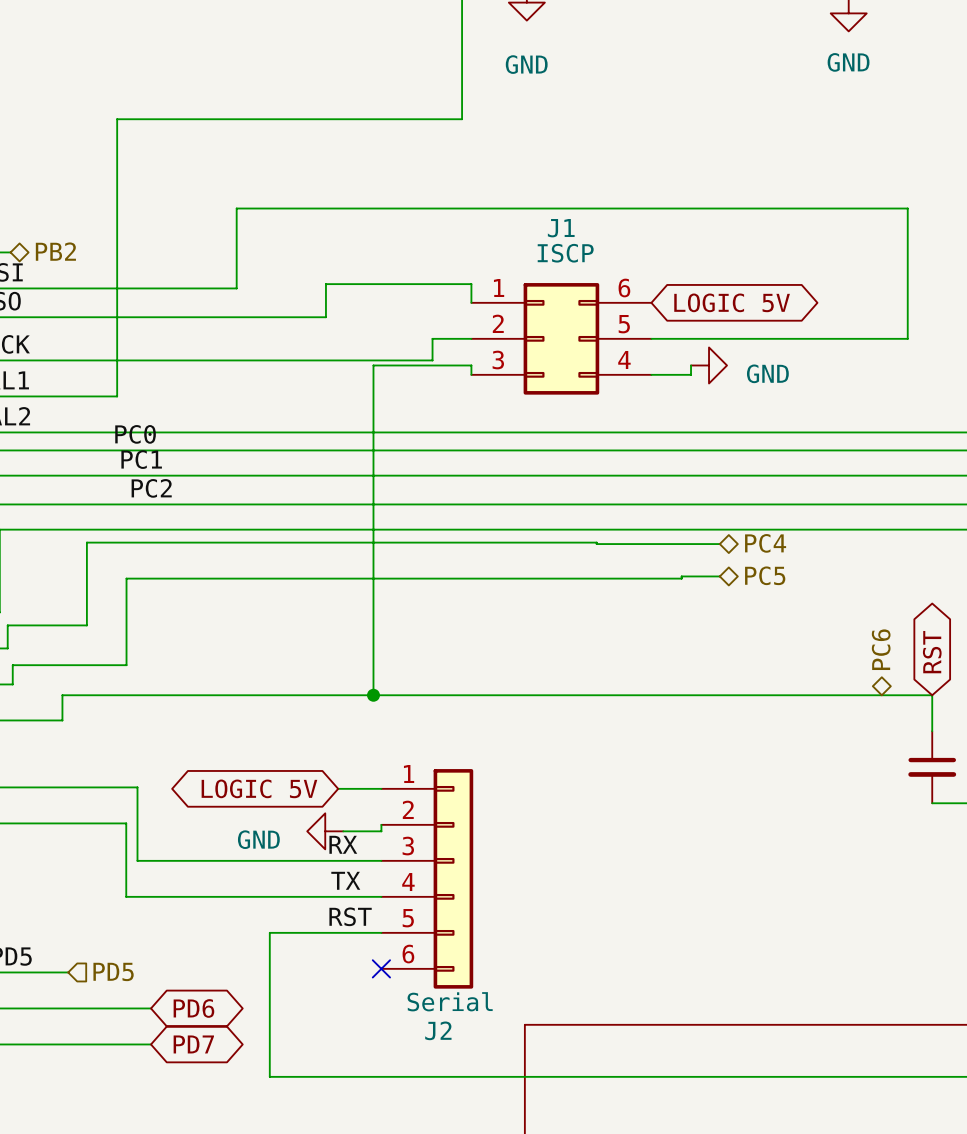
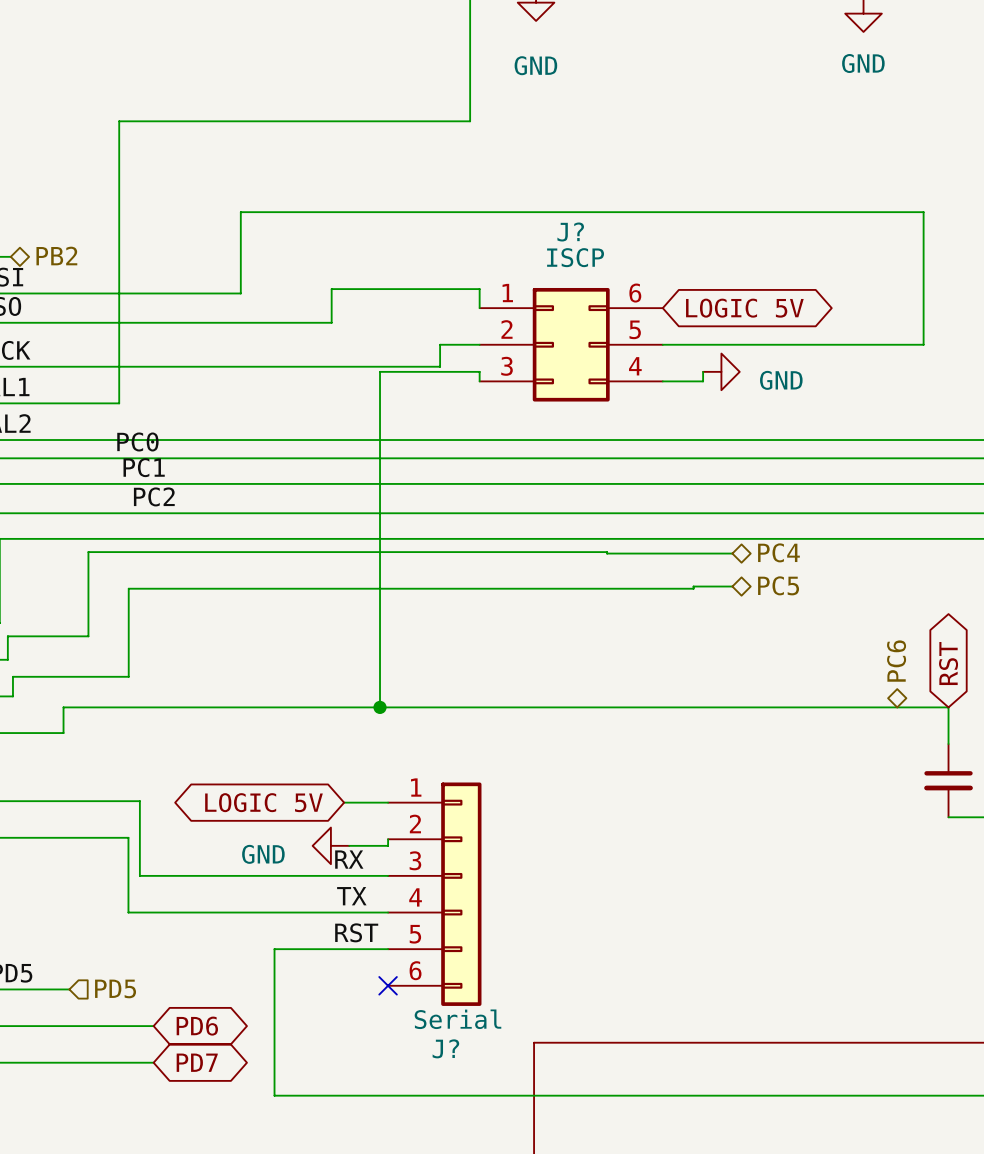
J1 name: J1 (561, 228) -> J? (570, 232)
J2 name: J2 (438, 1030) -> J? (445, 1048)

